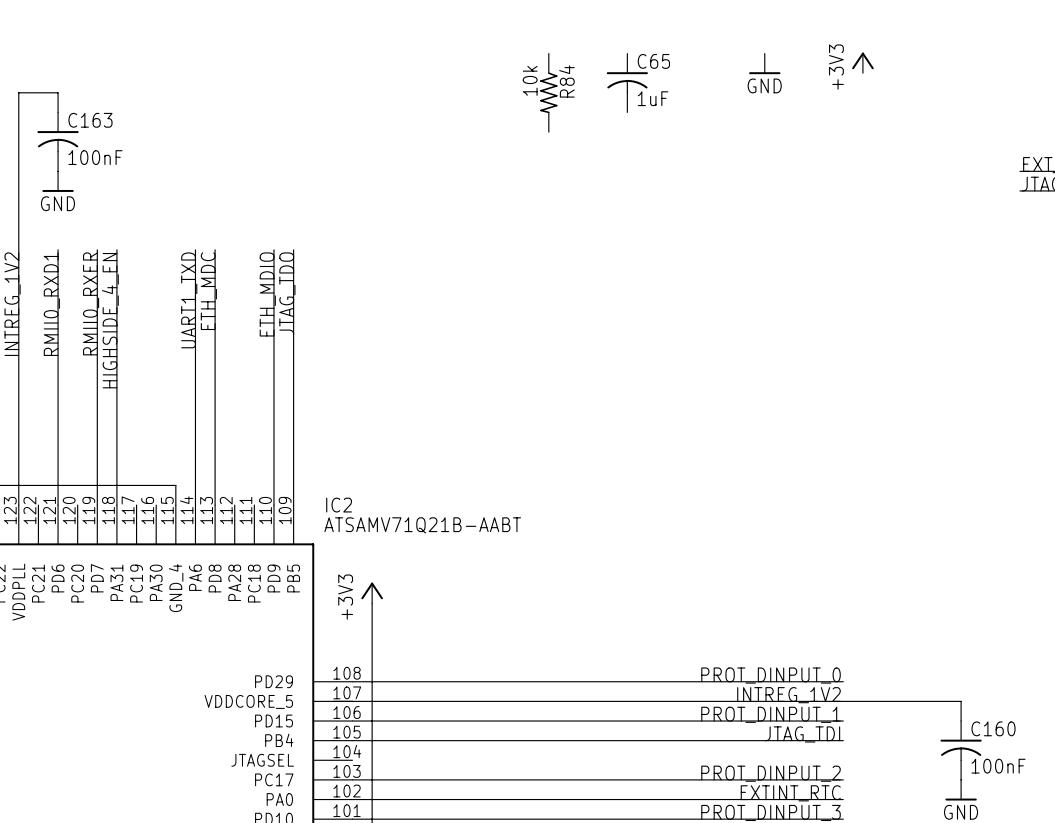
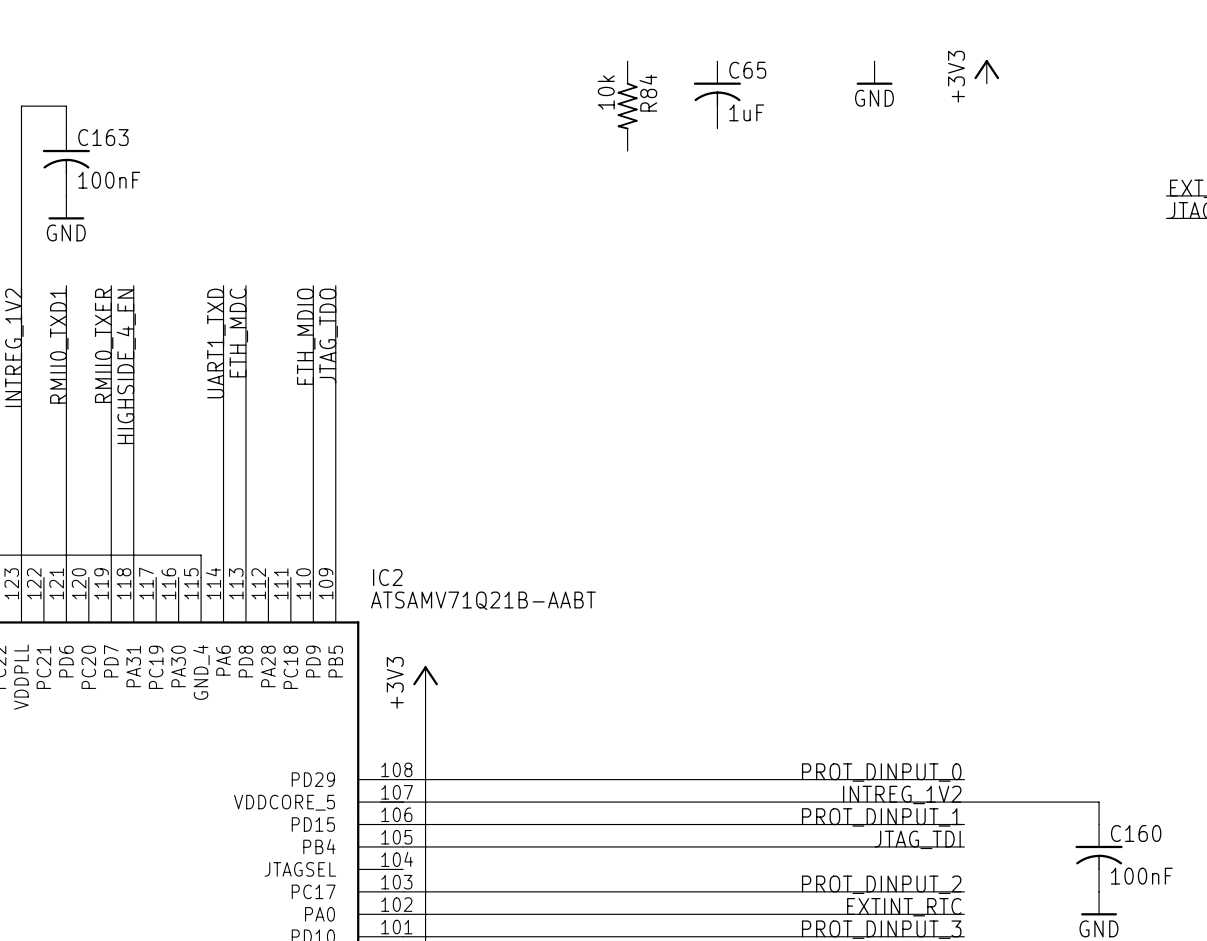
label: RMII0_RXER (91, 303) -> RMII0_TXER (104, 345)
label: RMII0_RXD1 (51, 304) -> RMII0_TXD1 (59, 346)

